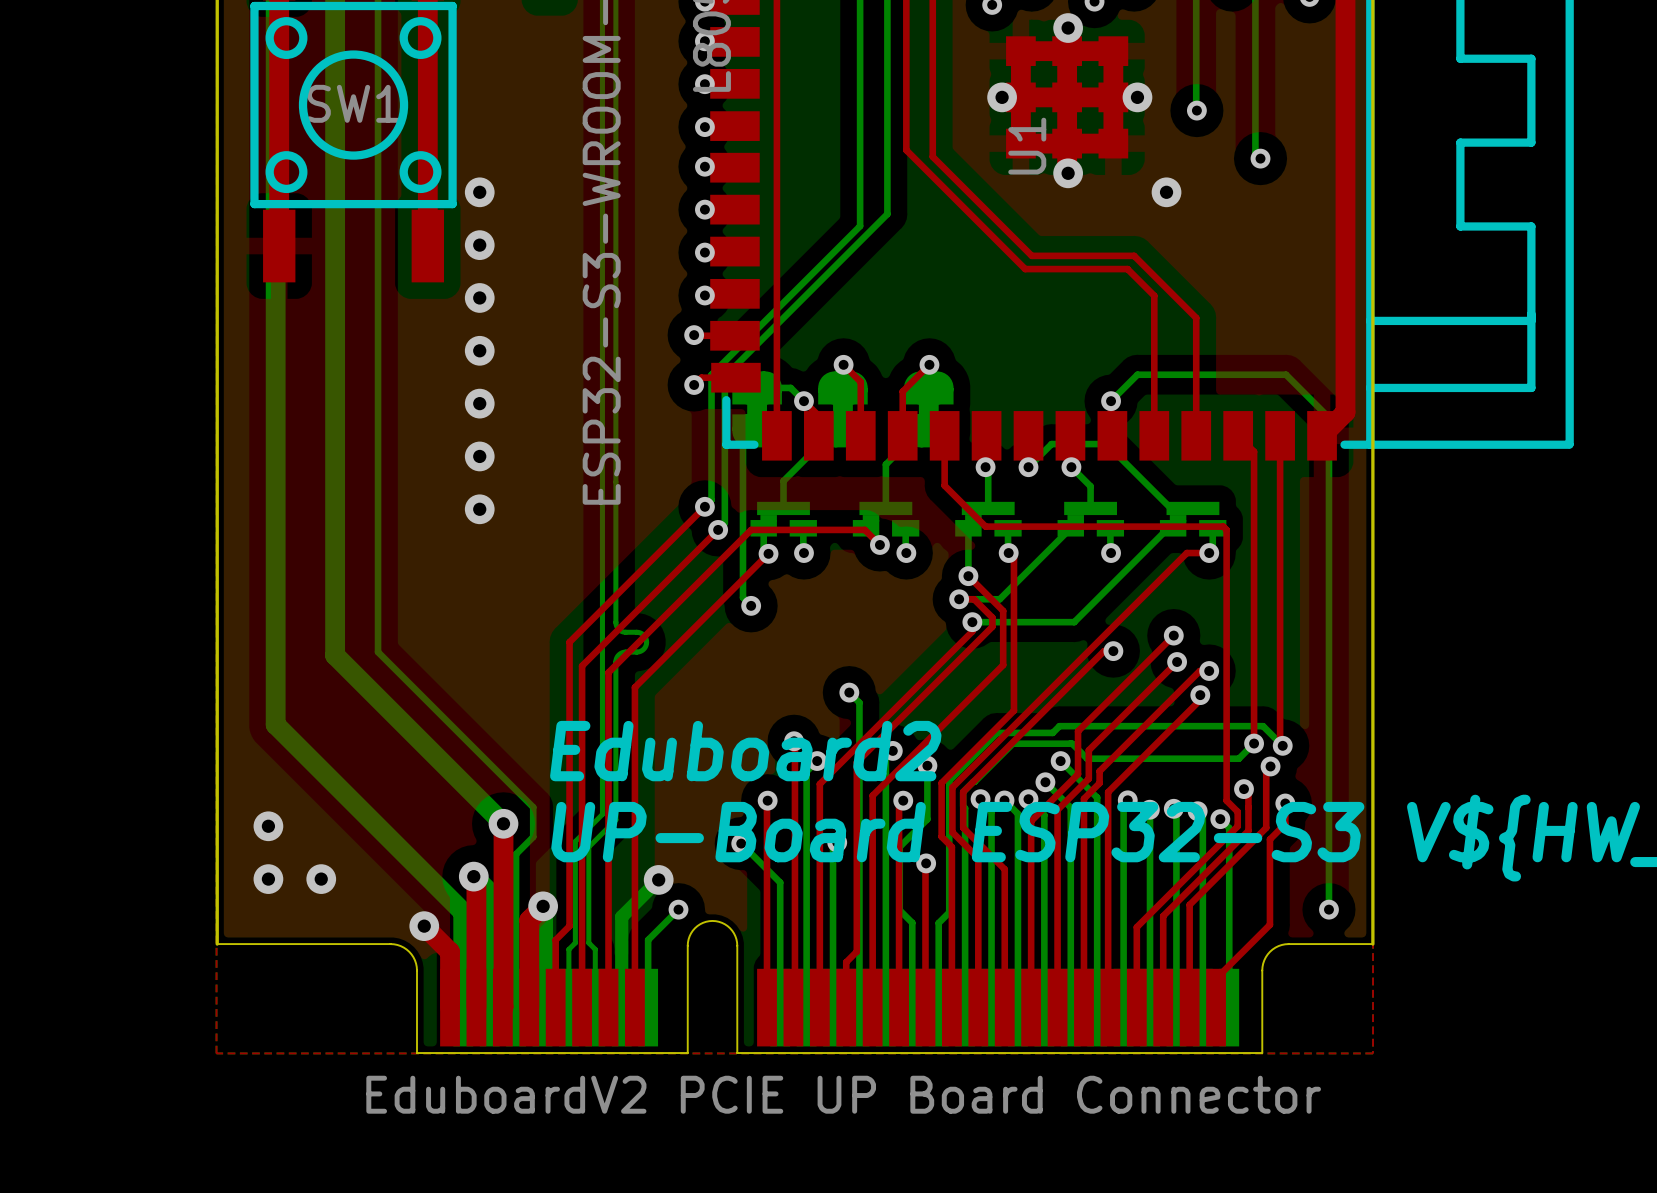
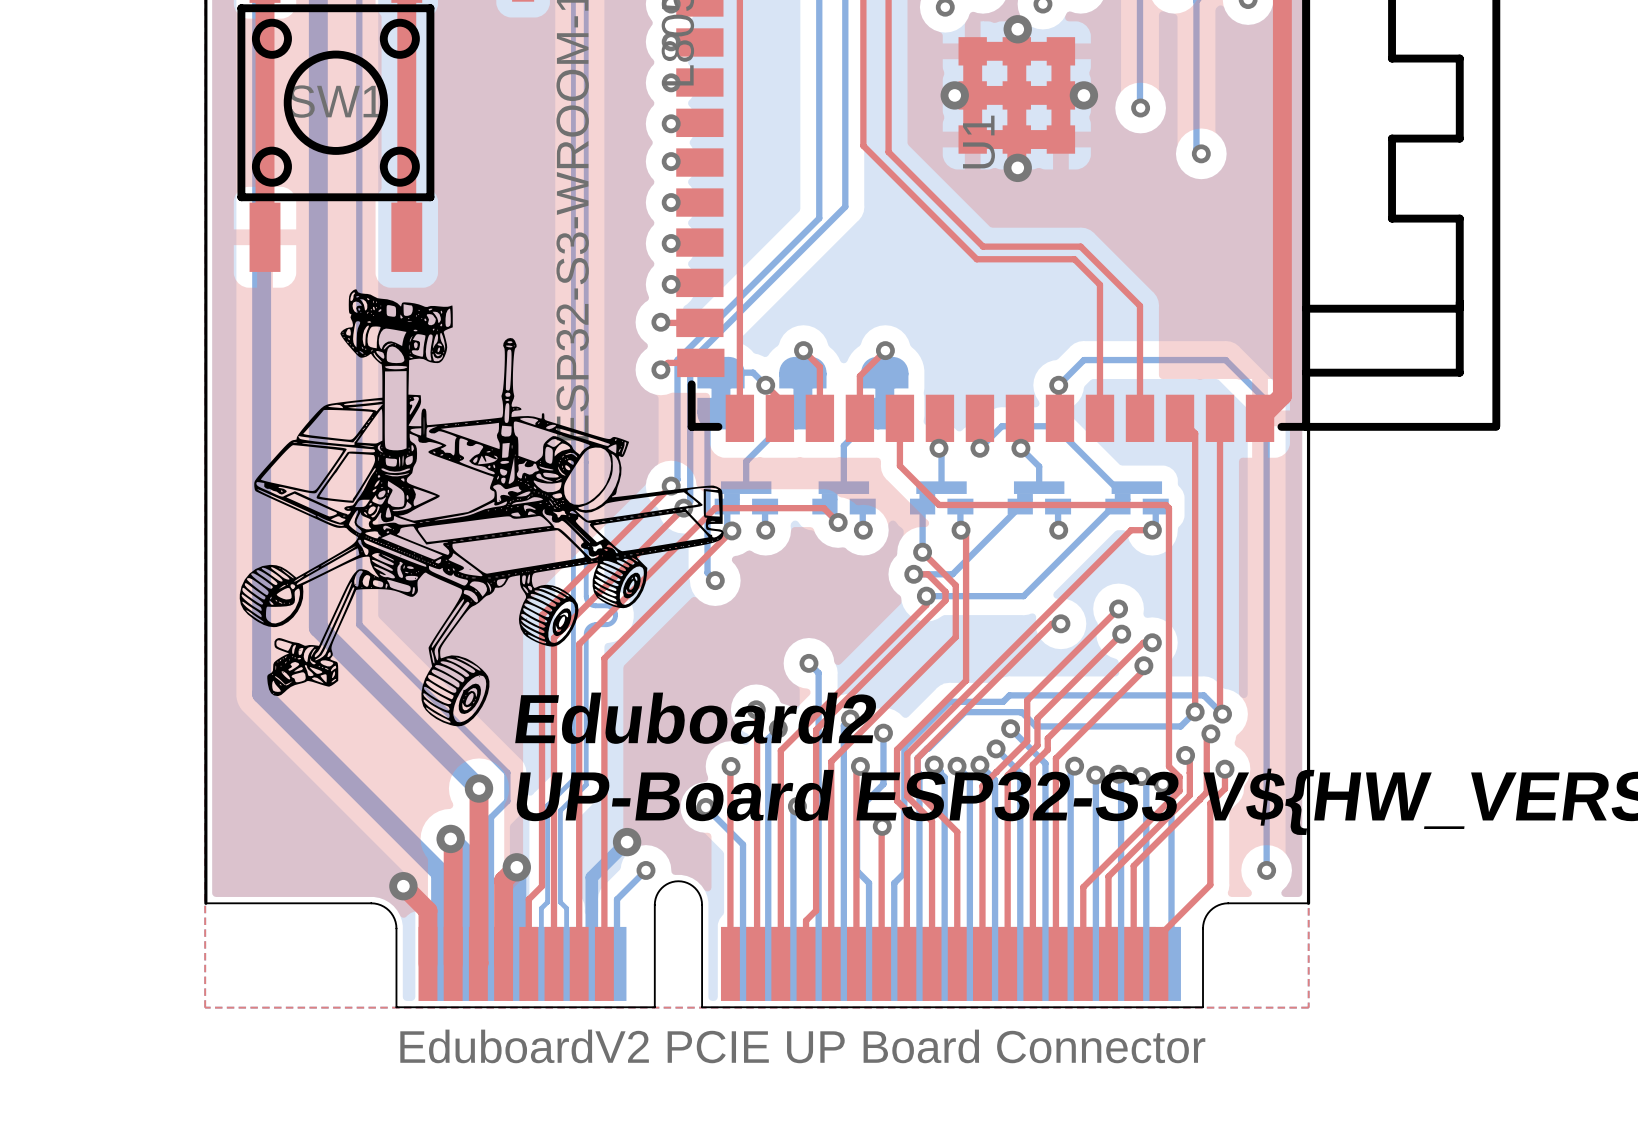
via: (479, 192) -> none
via: (1166, 192) -> none
via: (479, 245) -> none
via: (479, 297) -> none
drawing: none -> [239, 289, 724, 727]
via: (479, 350) -> none
via: (479, 403) -> none
via: (479, 456) -> none
via: (479, 509) -> none
via: (268, 826) -> none
via: (268, 879) -> none
via: (321, 879) -> none

